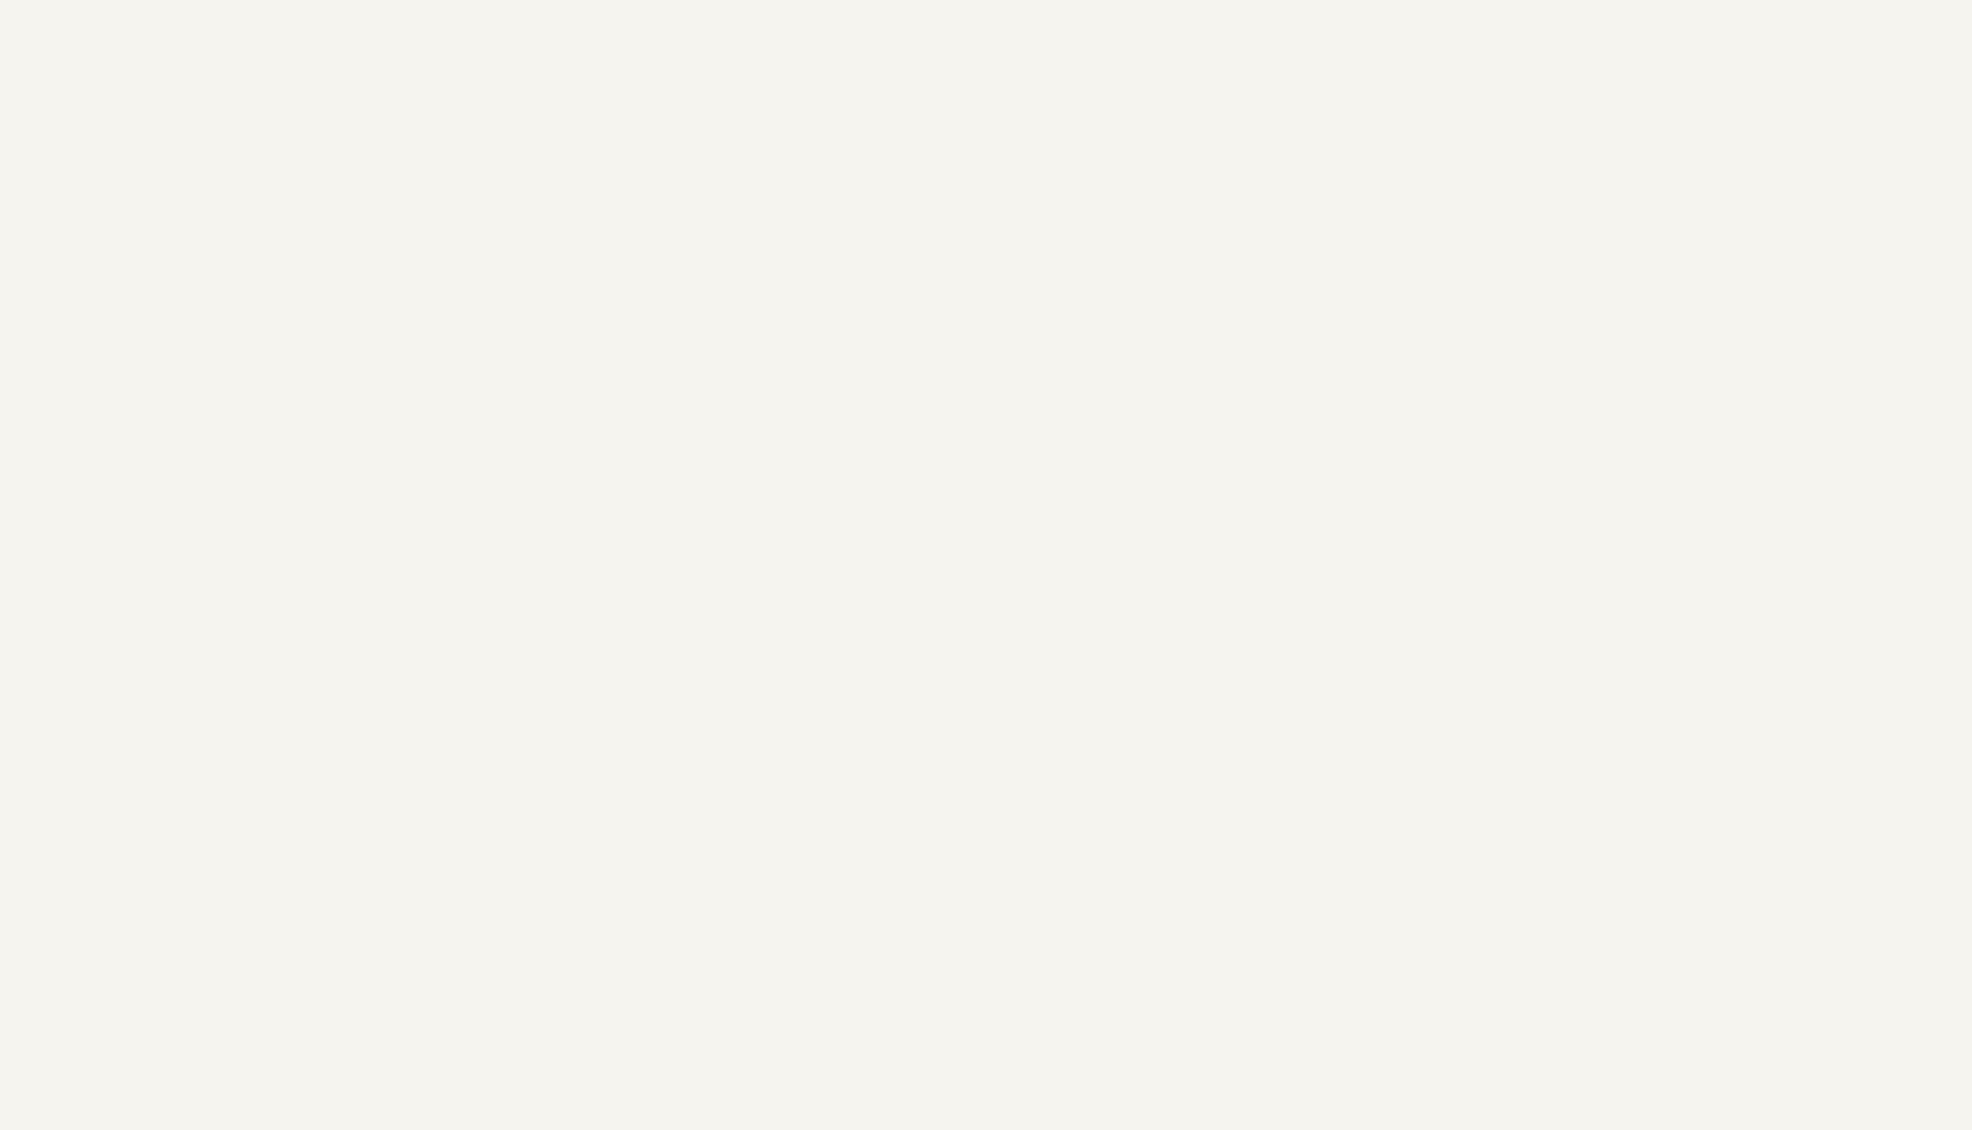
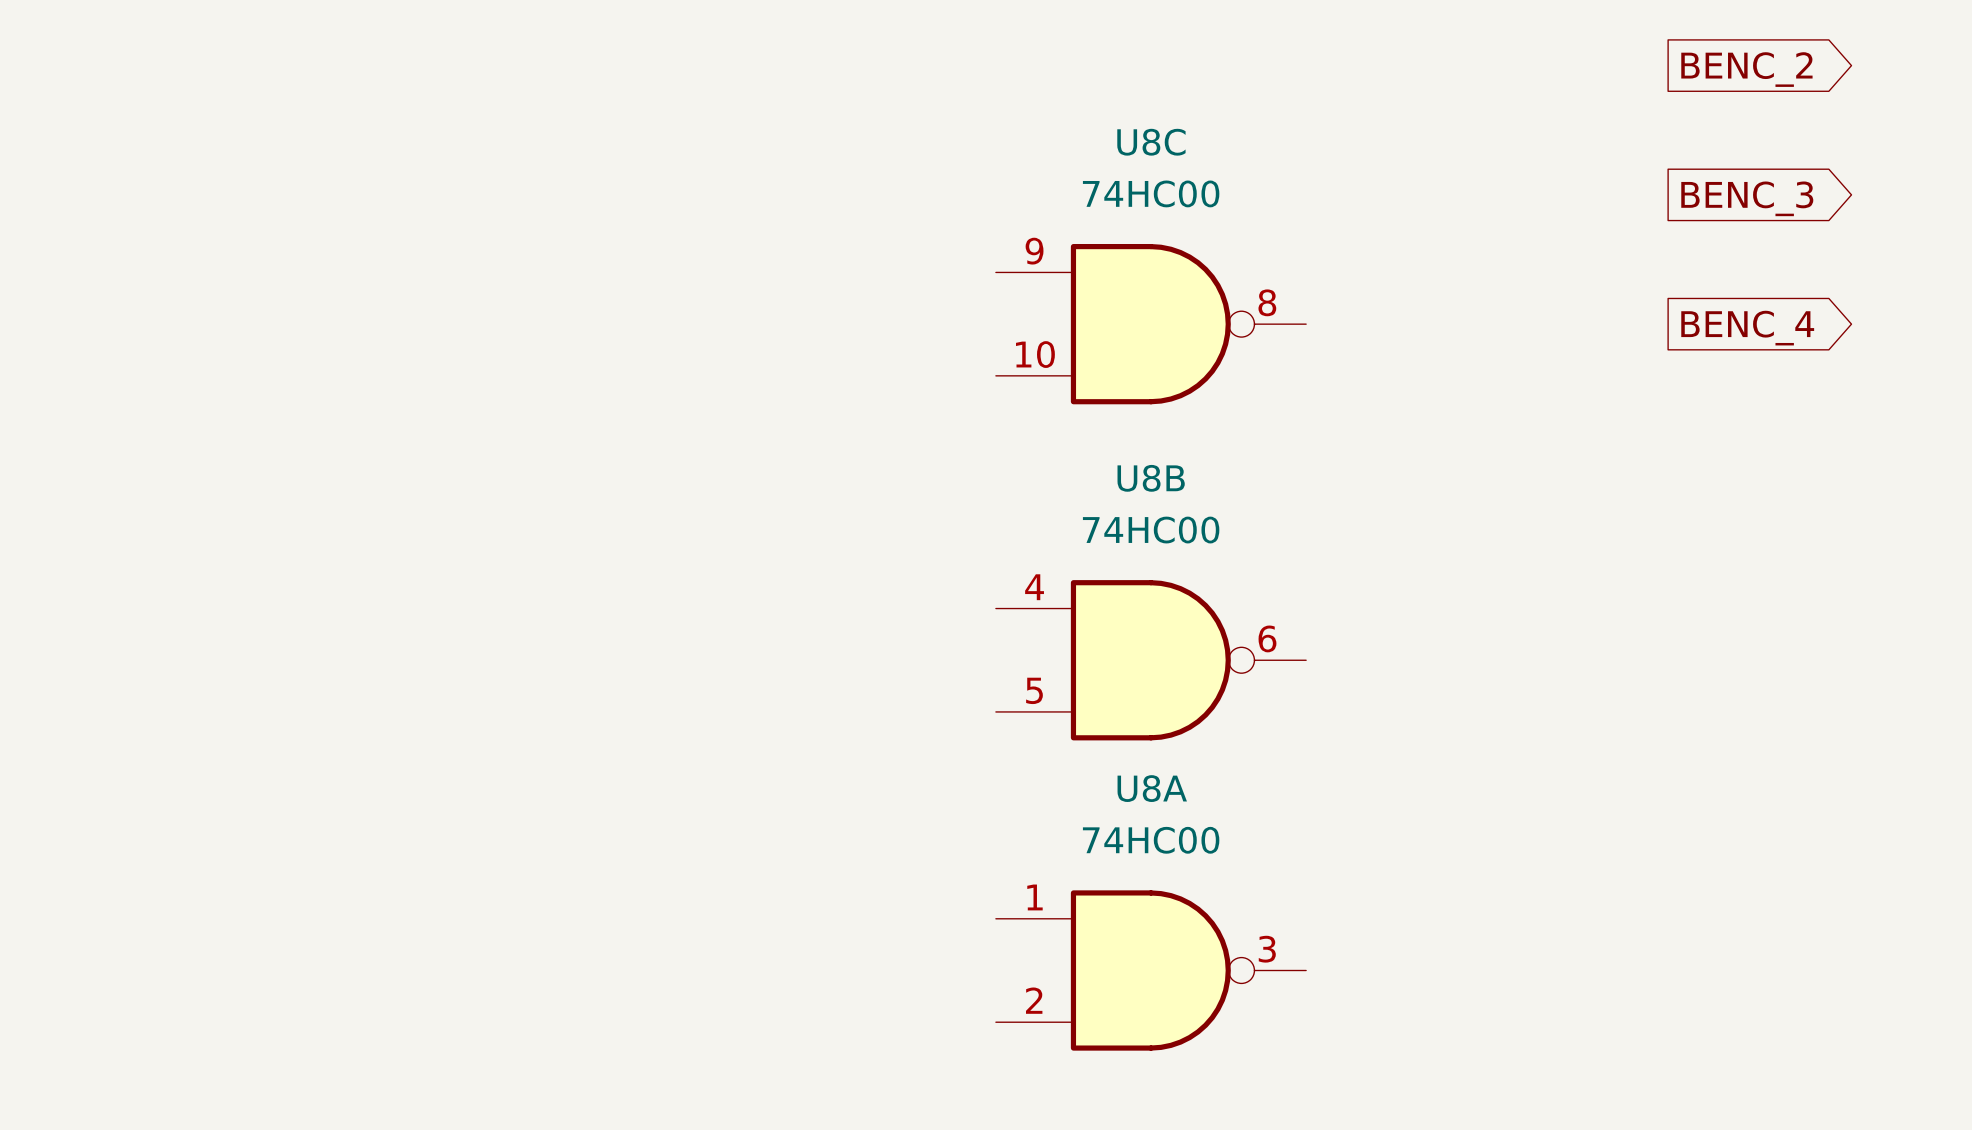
global label: none -> BENC_2 (1746, 69)
global label: none -> BENC_3 (1747, 198)
U8C: none -> 74HC00 (1151, 324)
global label: none -> BENC_4 (1747, 328)
U8B: none -> 74HC00 (1151, 660)
U8A: none -> 74HC00 (1151, 970)

